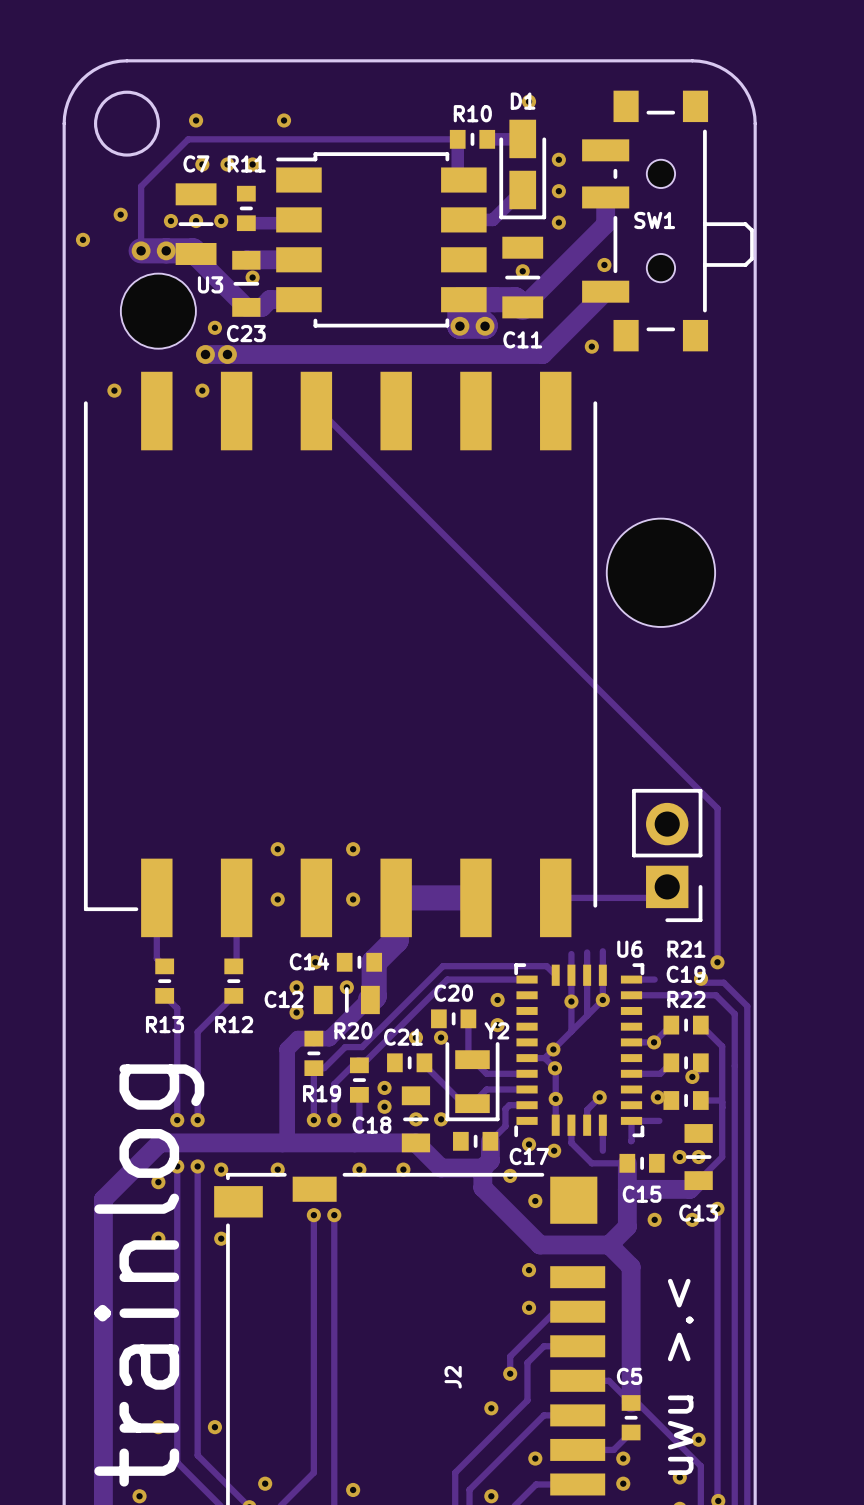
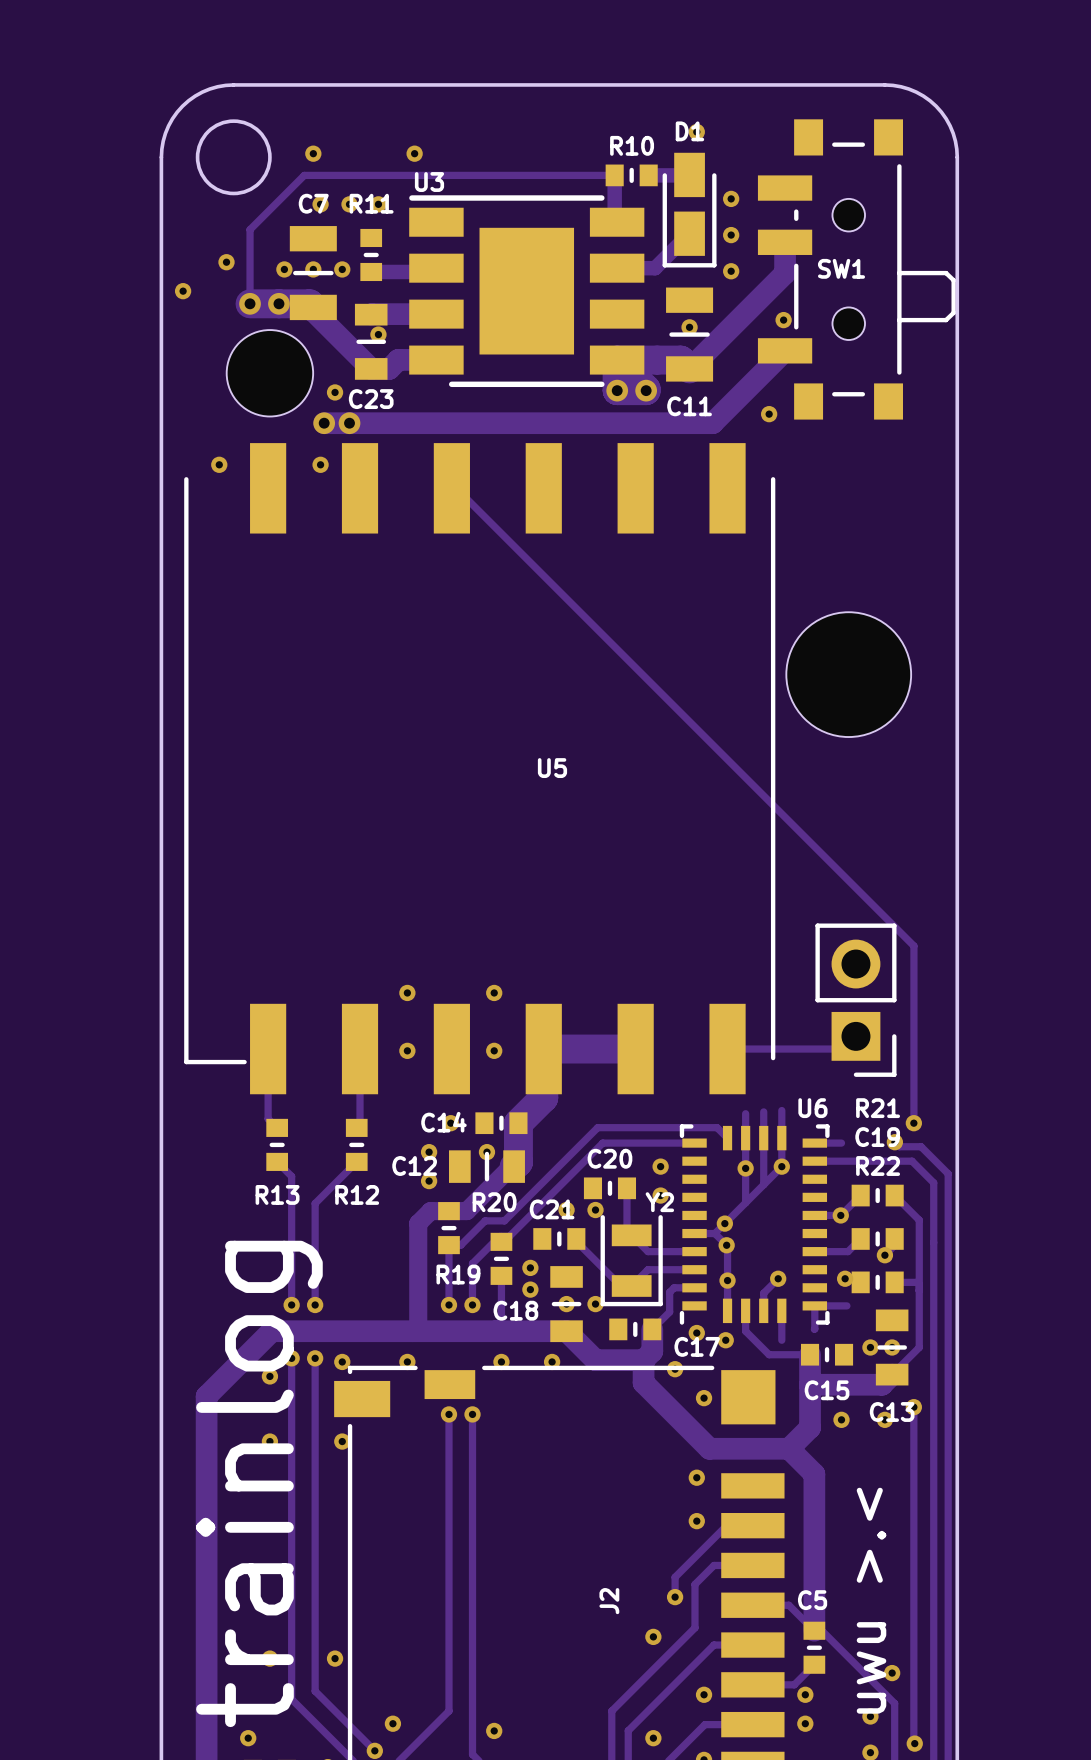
U3 footprint: [276, 152, 487, 328] -> [409, 195, 645, 388]
U3 name position: U3 (210, 284) -> U3 (429, 182)
U5 name: none -> U5 (552, 768)

